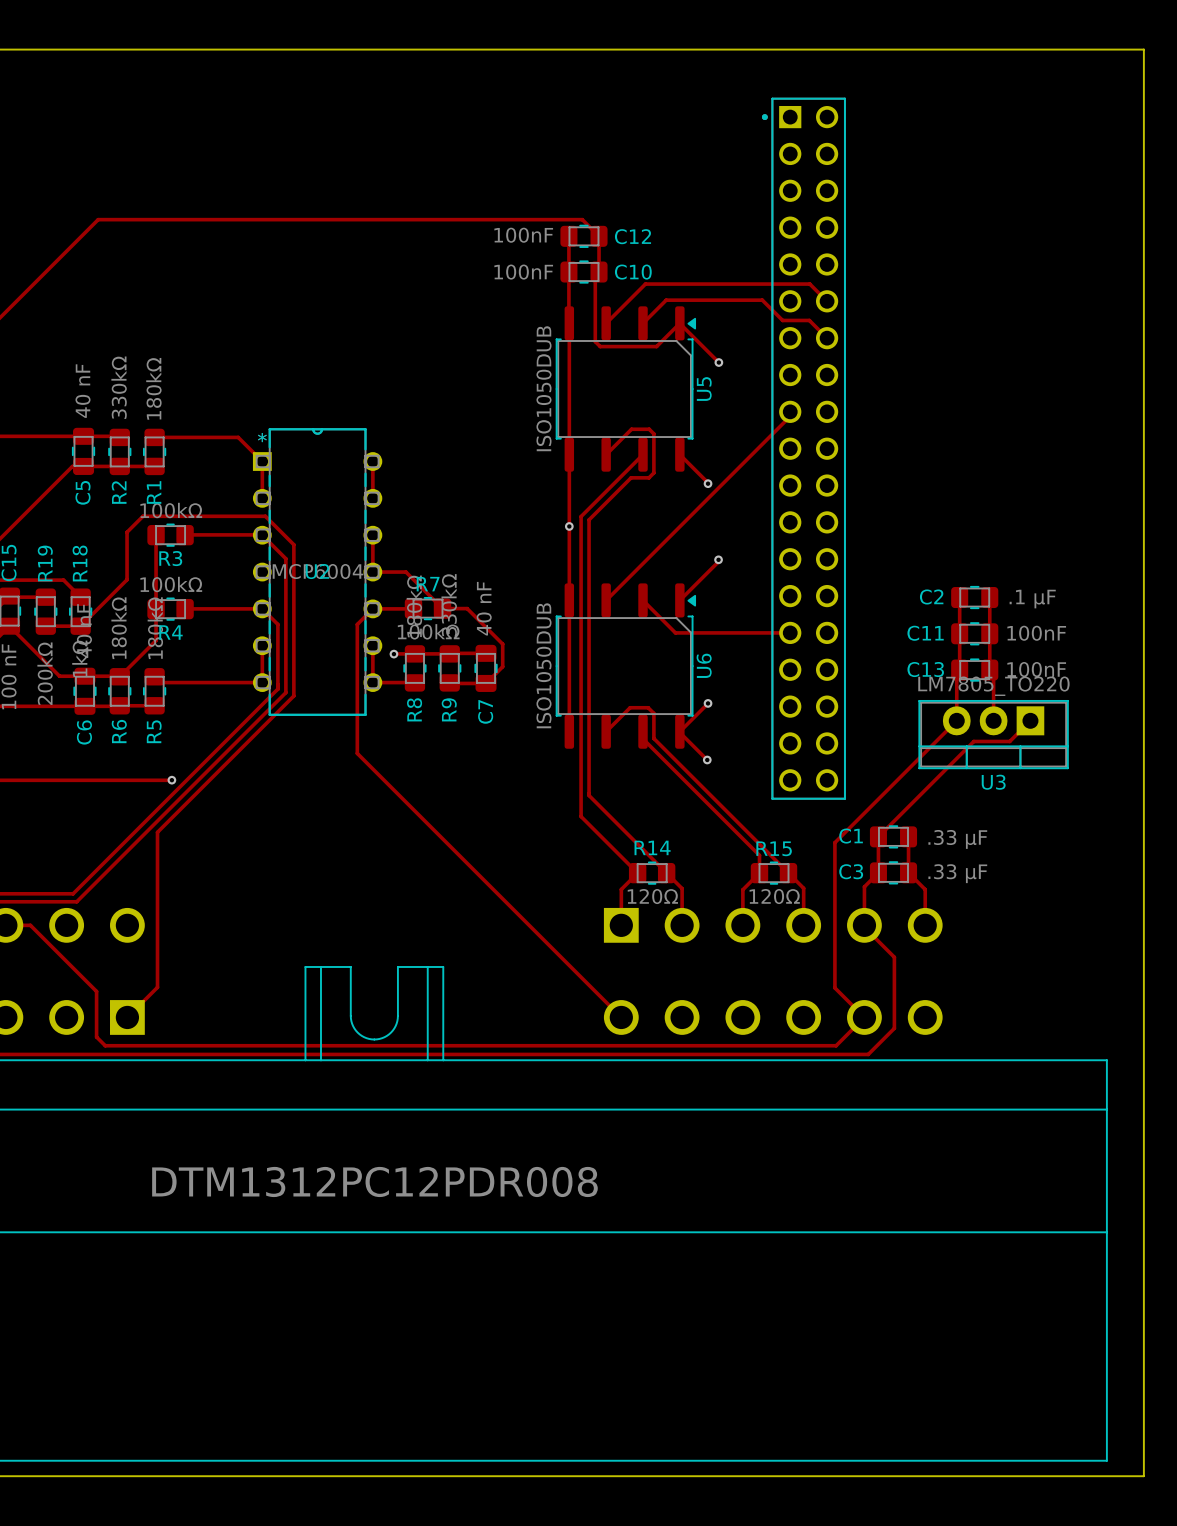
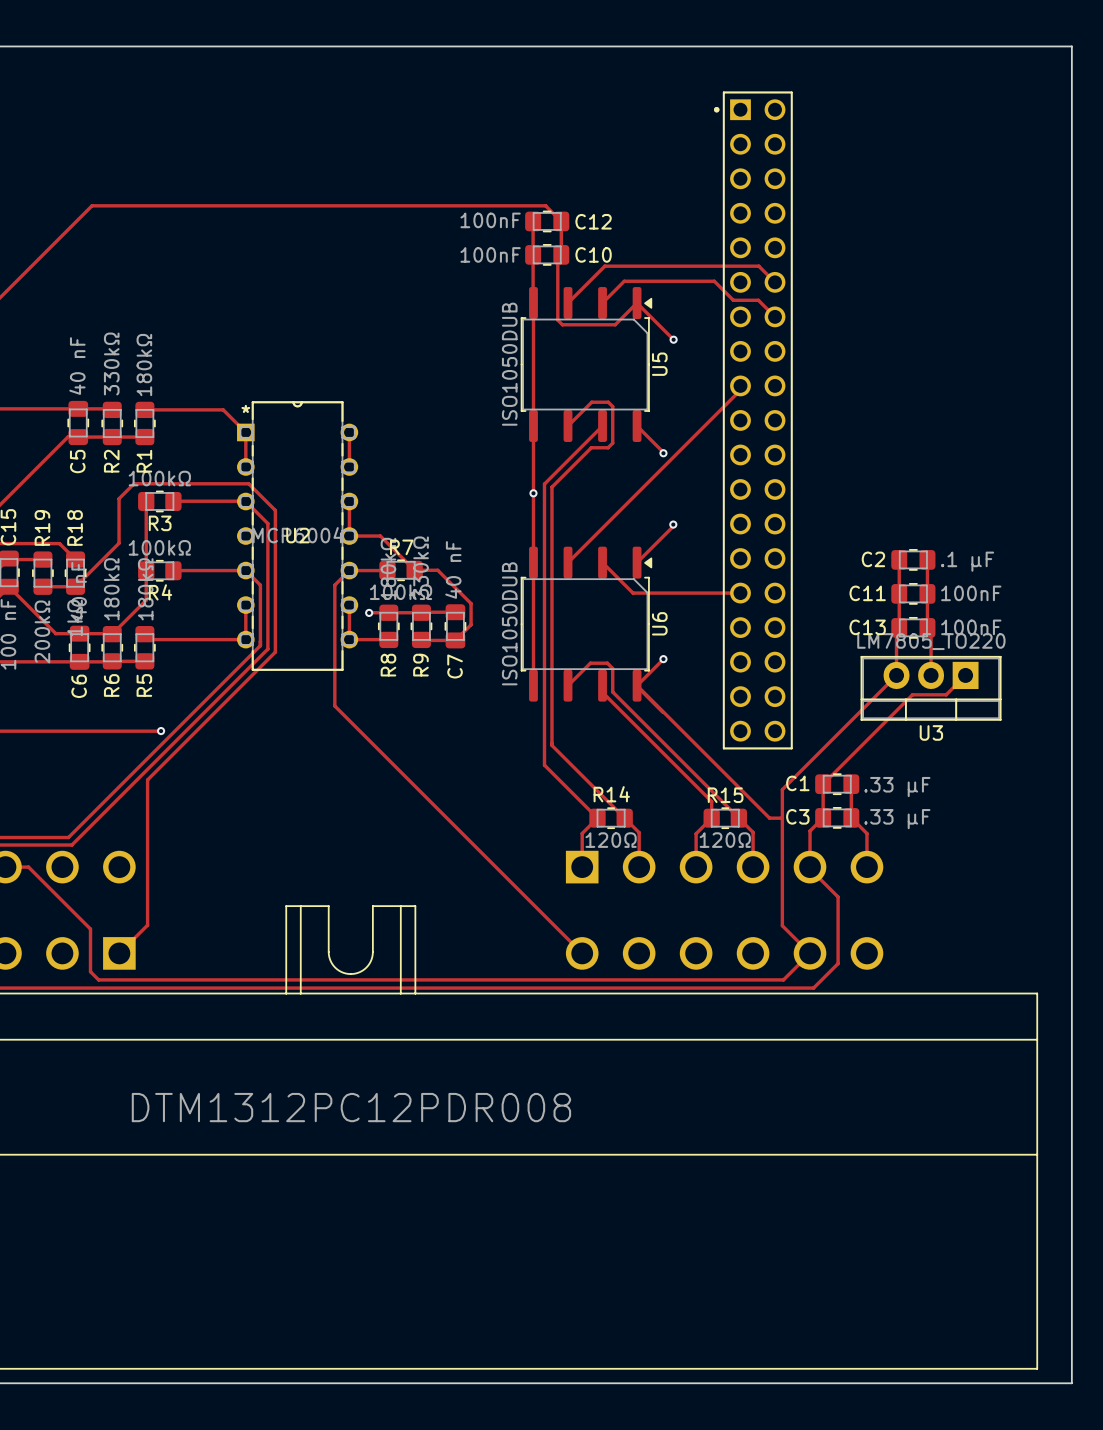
track: none -> (637, 685) (769, 818) (782, 818)
via: (707, 759) -> none

